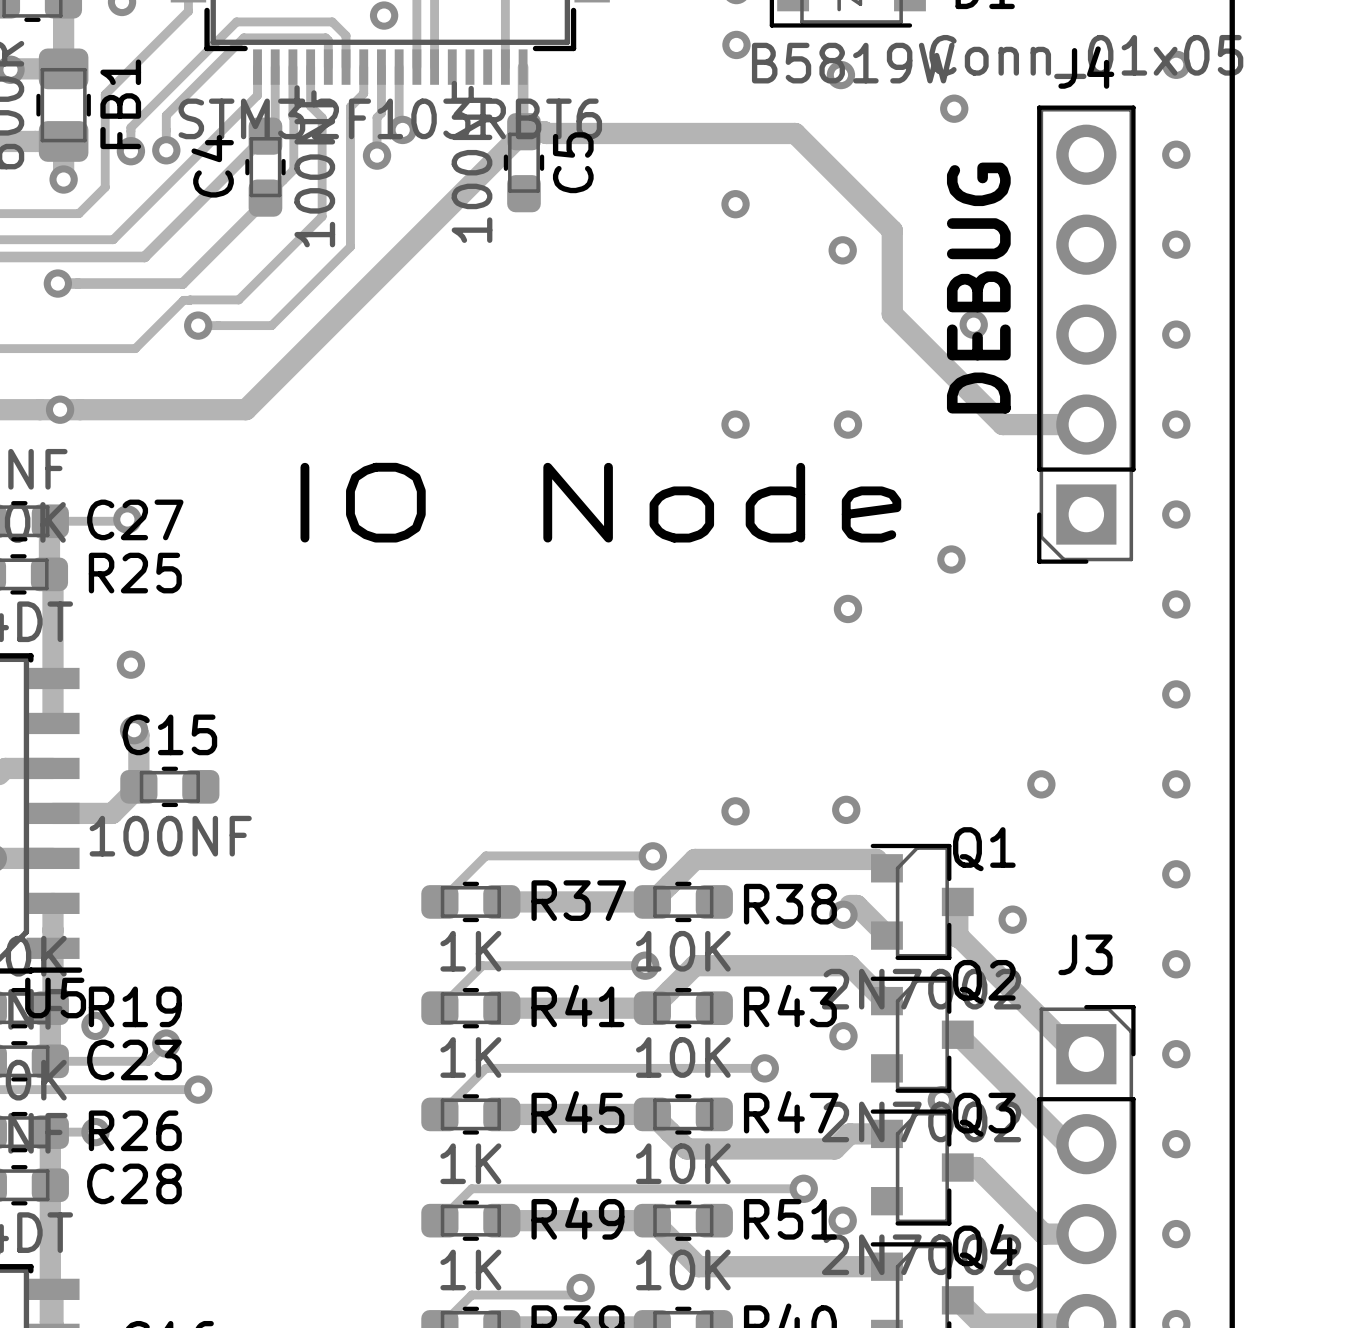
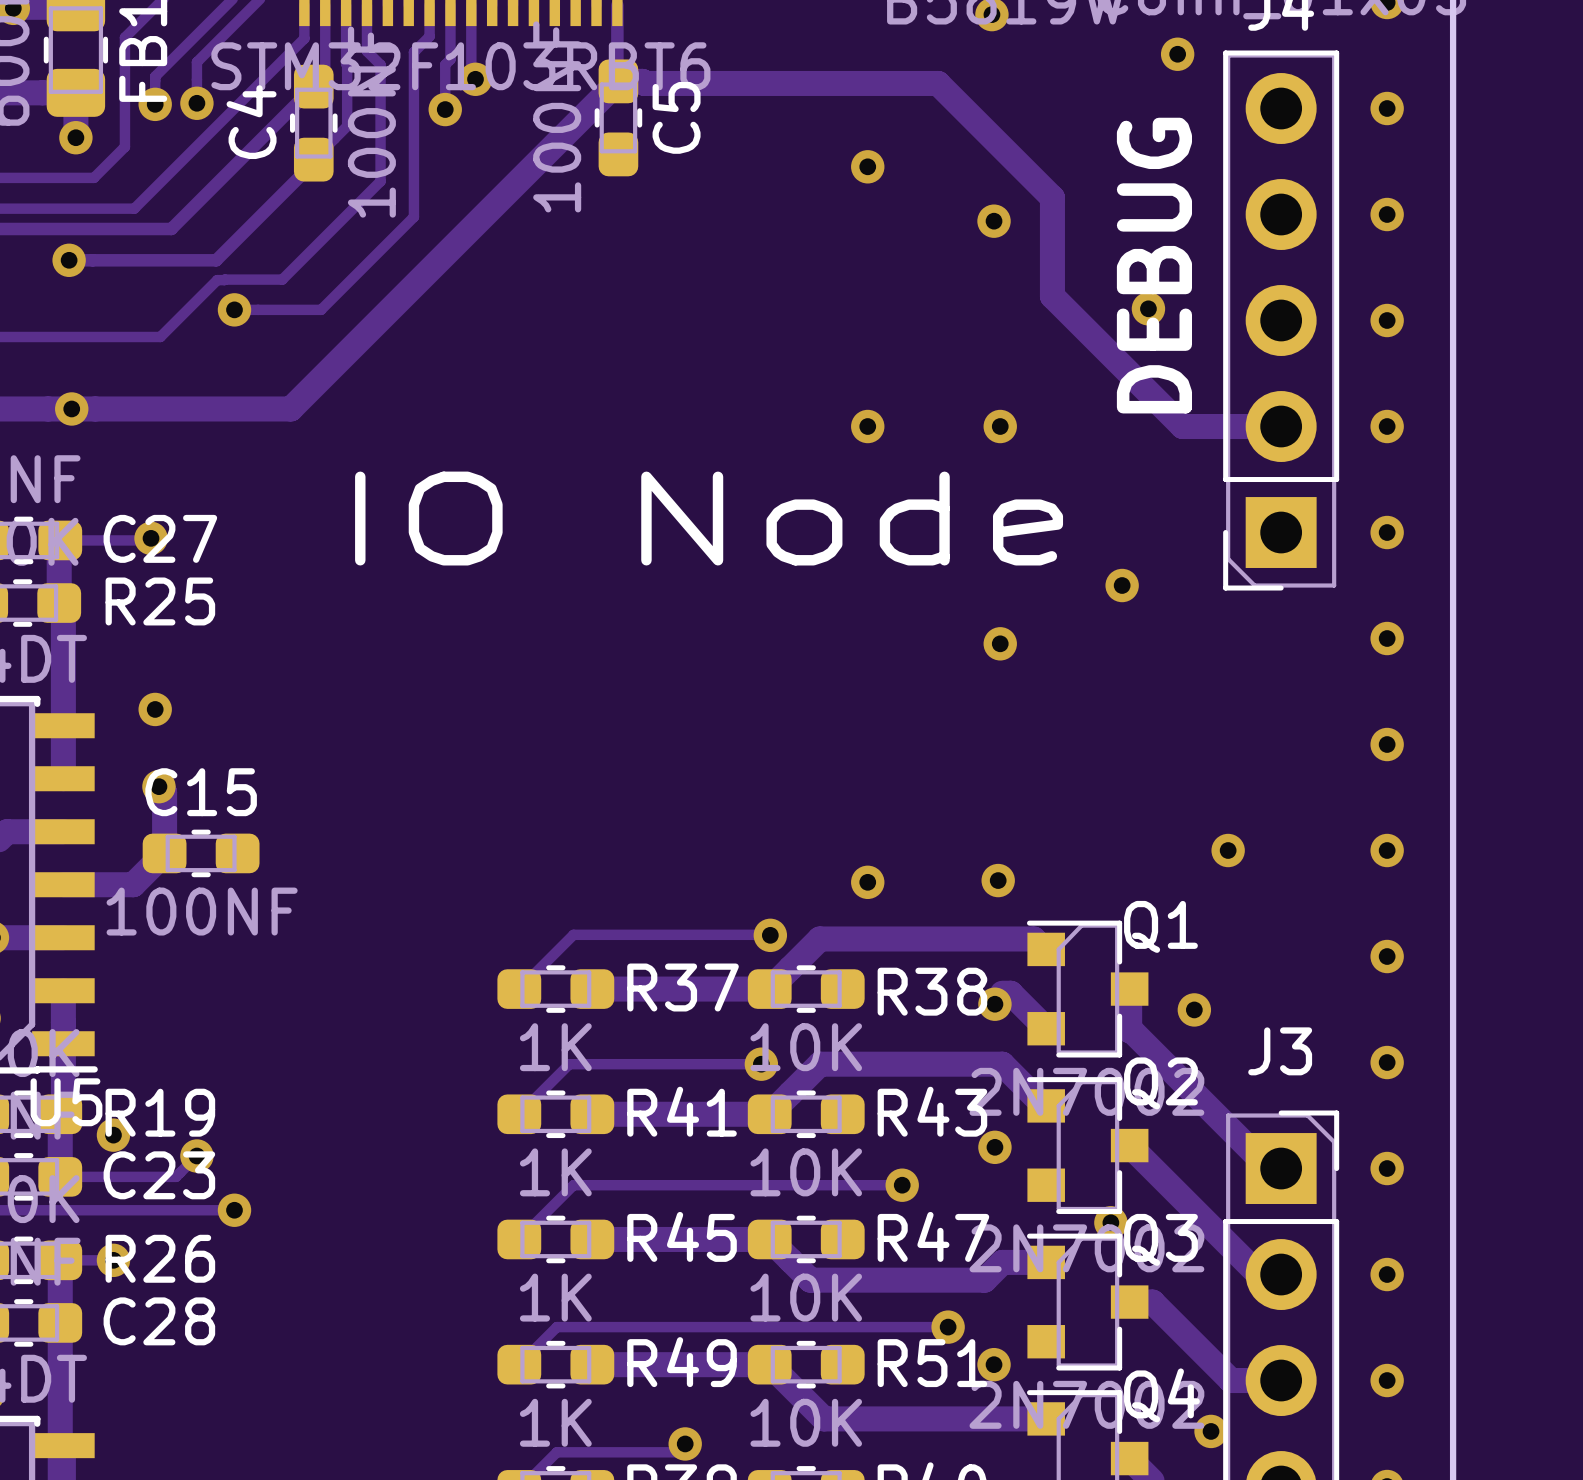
via position: (954, 108) -> (1177, 54)

